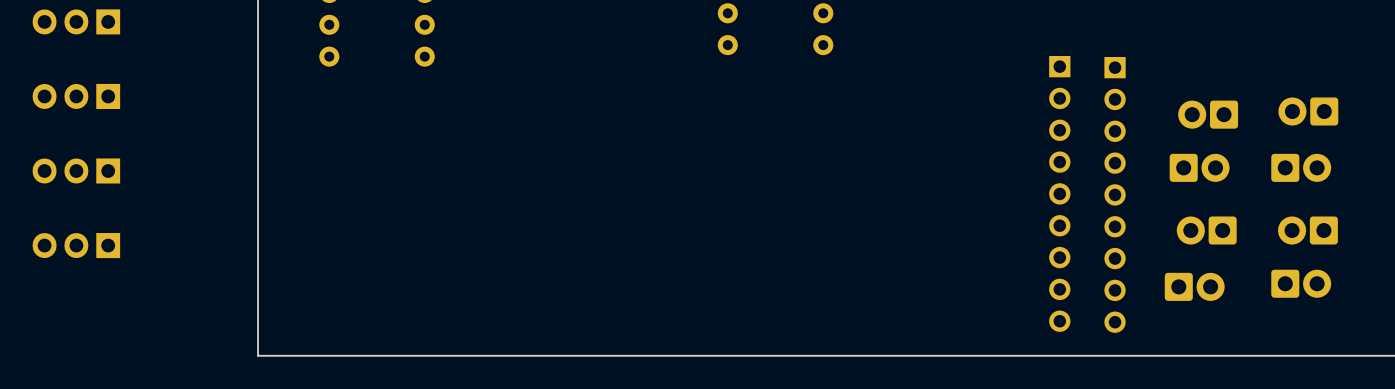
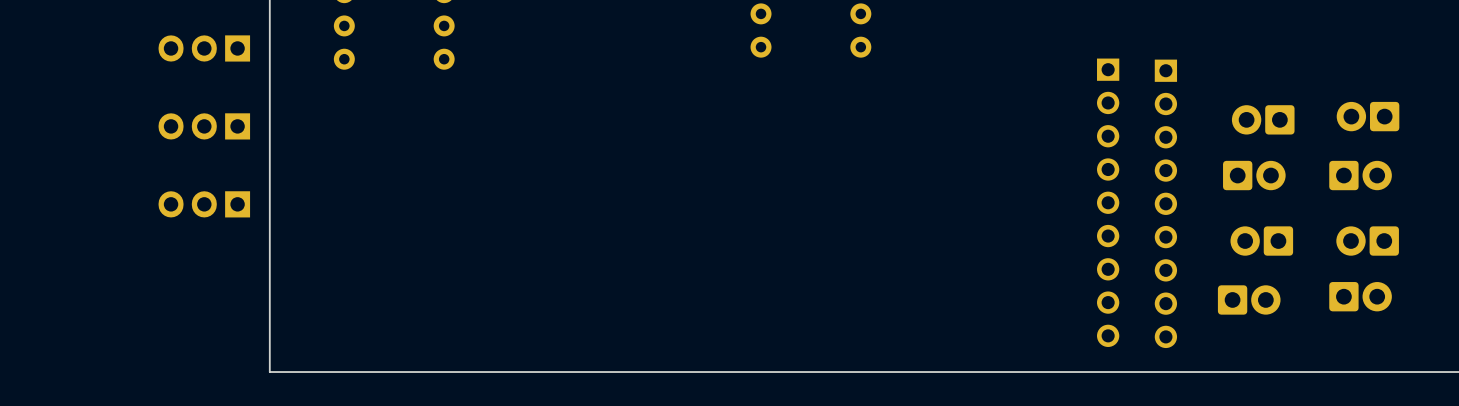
part: (76, 21) -> none
part: none -> (204, 48)
part: (76, 96) -> none
part: none -> (204, 126)
part: (76, 171) -> none
part: none -> (204, 204)
part: (76, 245) -> none

